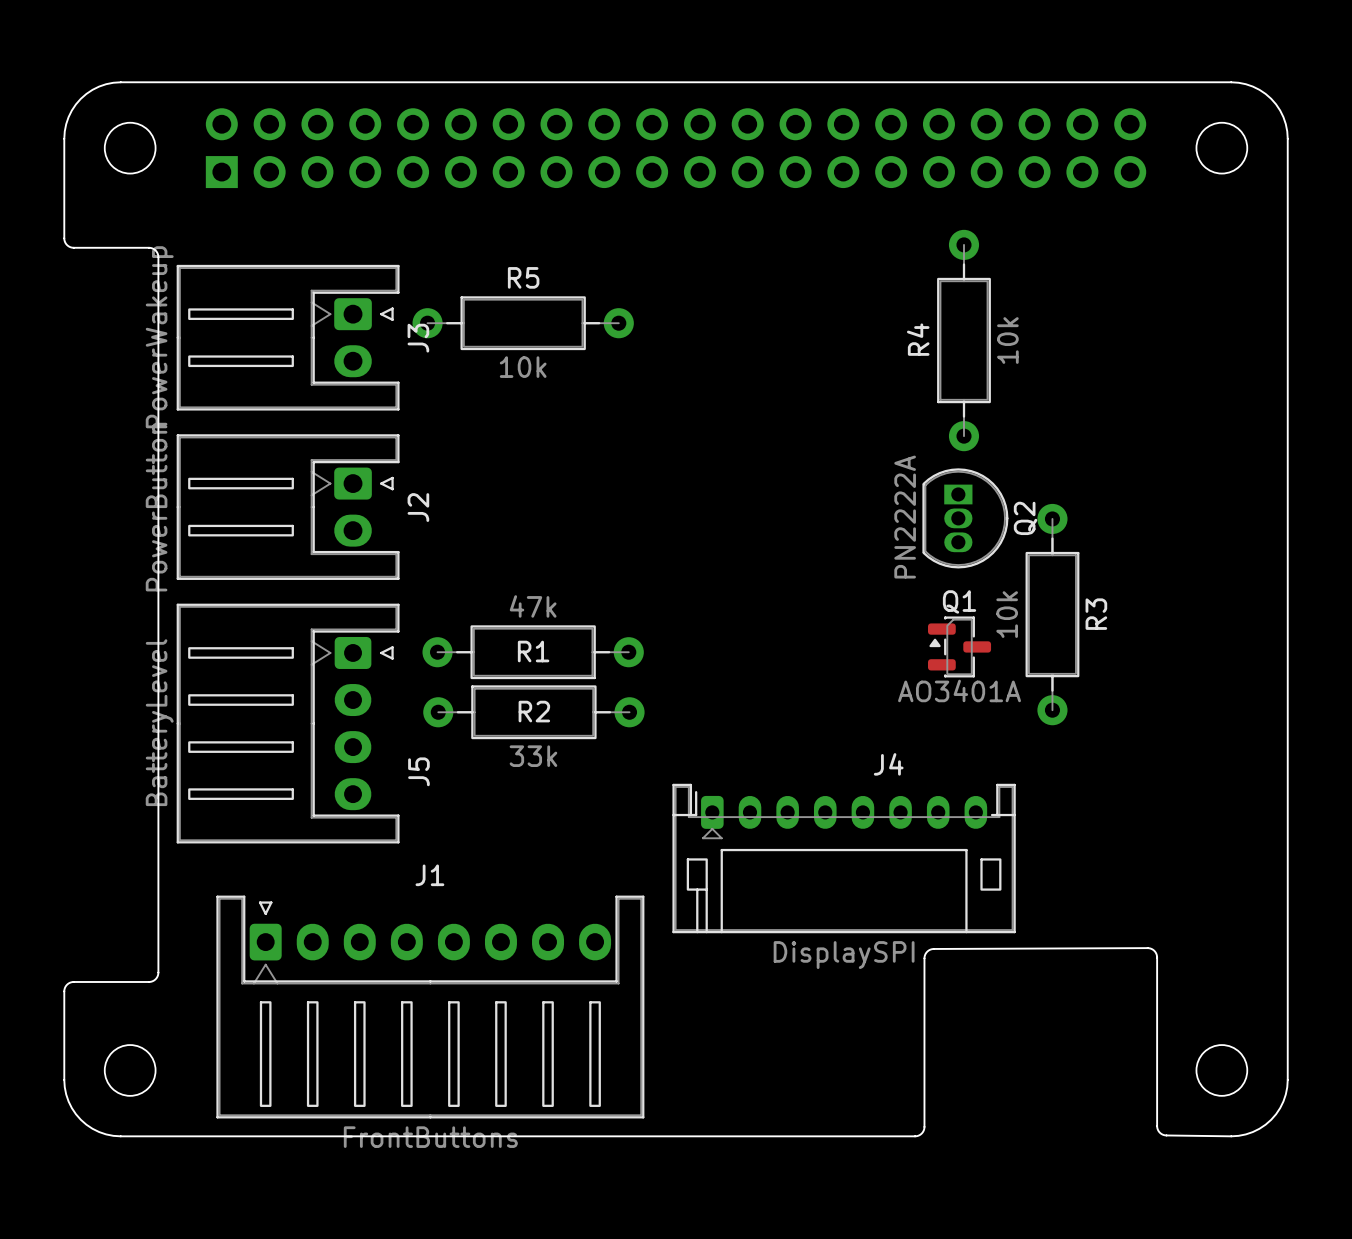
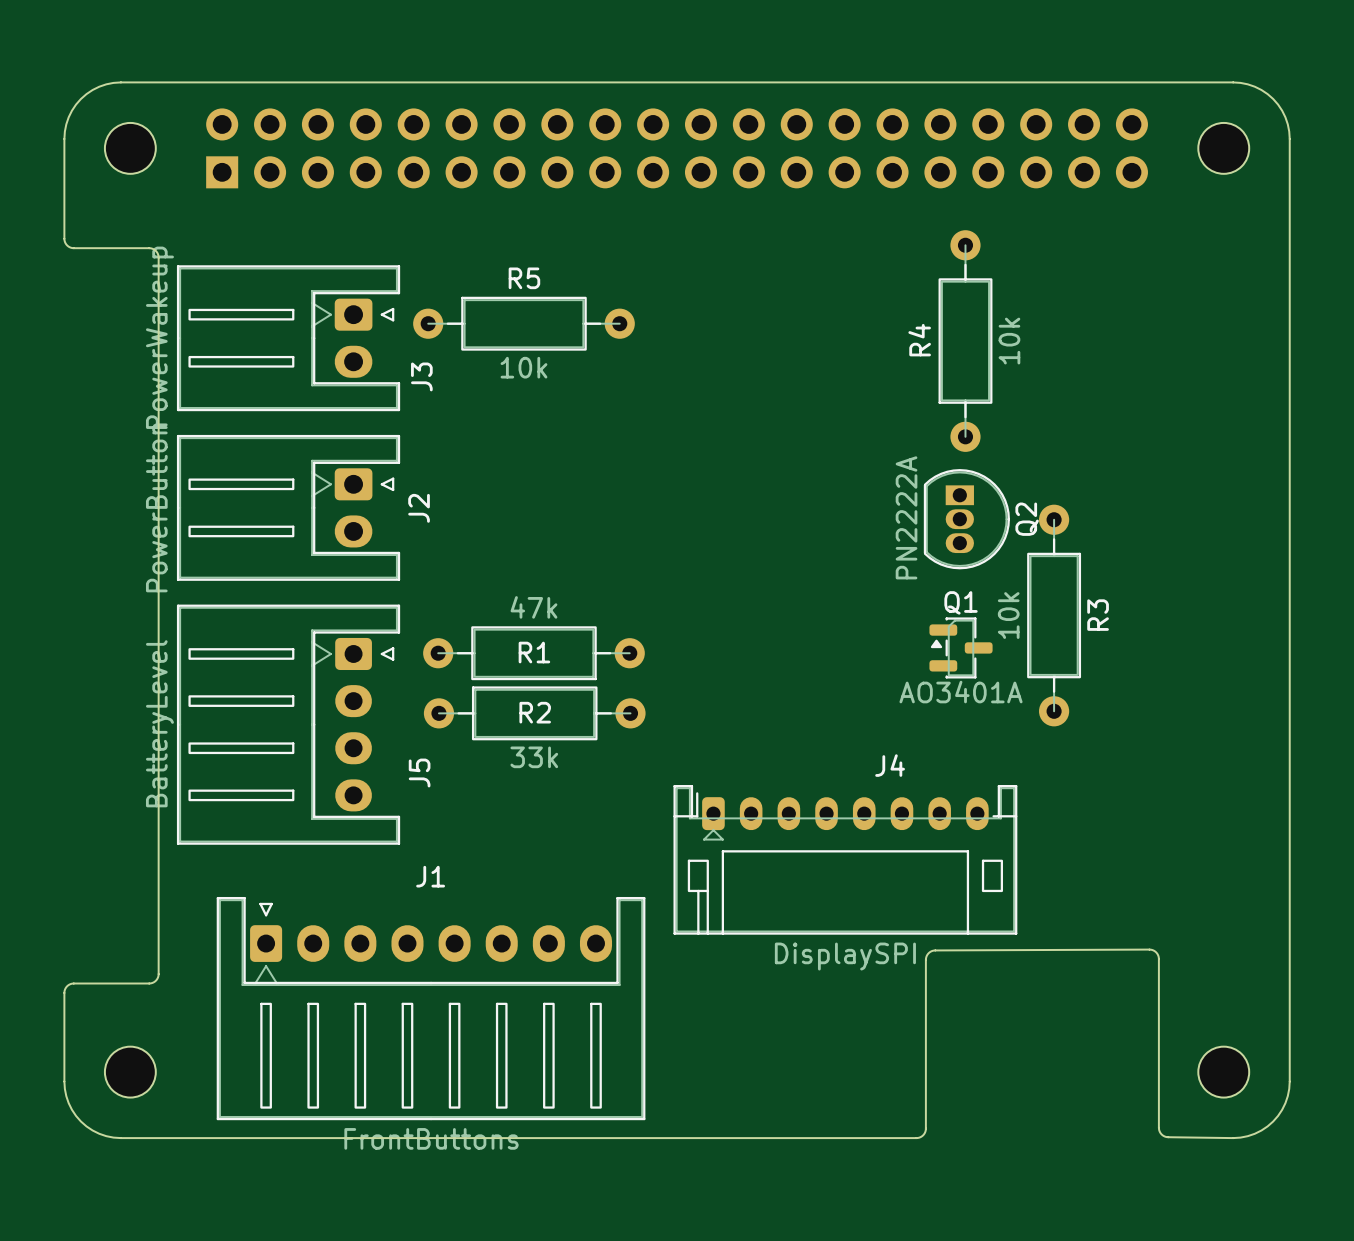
J3 name position: J3 (418, 338) -> J3 (421, 376)

